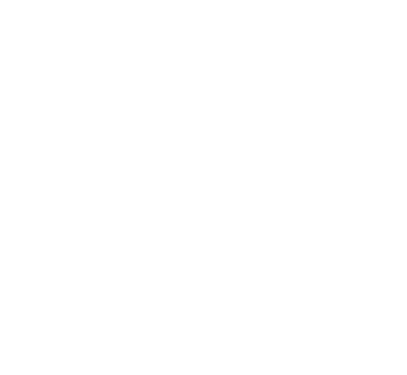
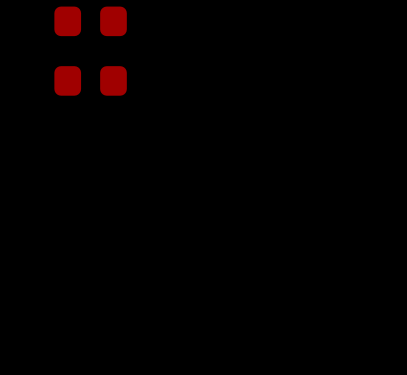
part: none -> (90, 21)
part: none -> (90, 80)

